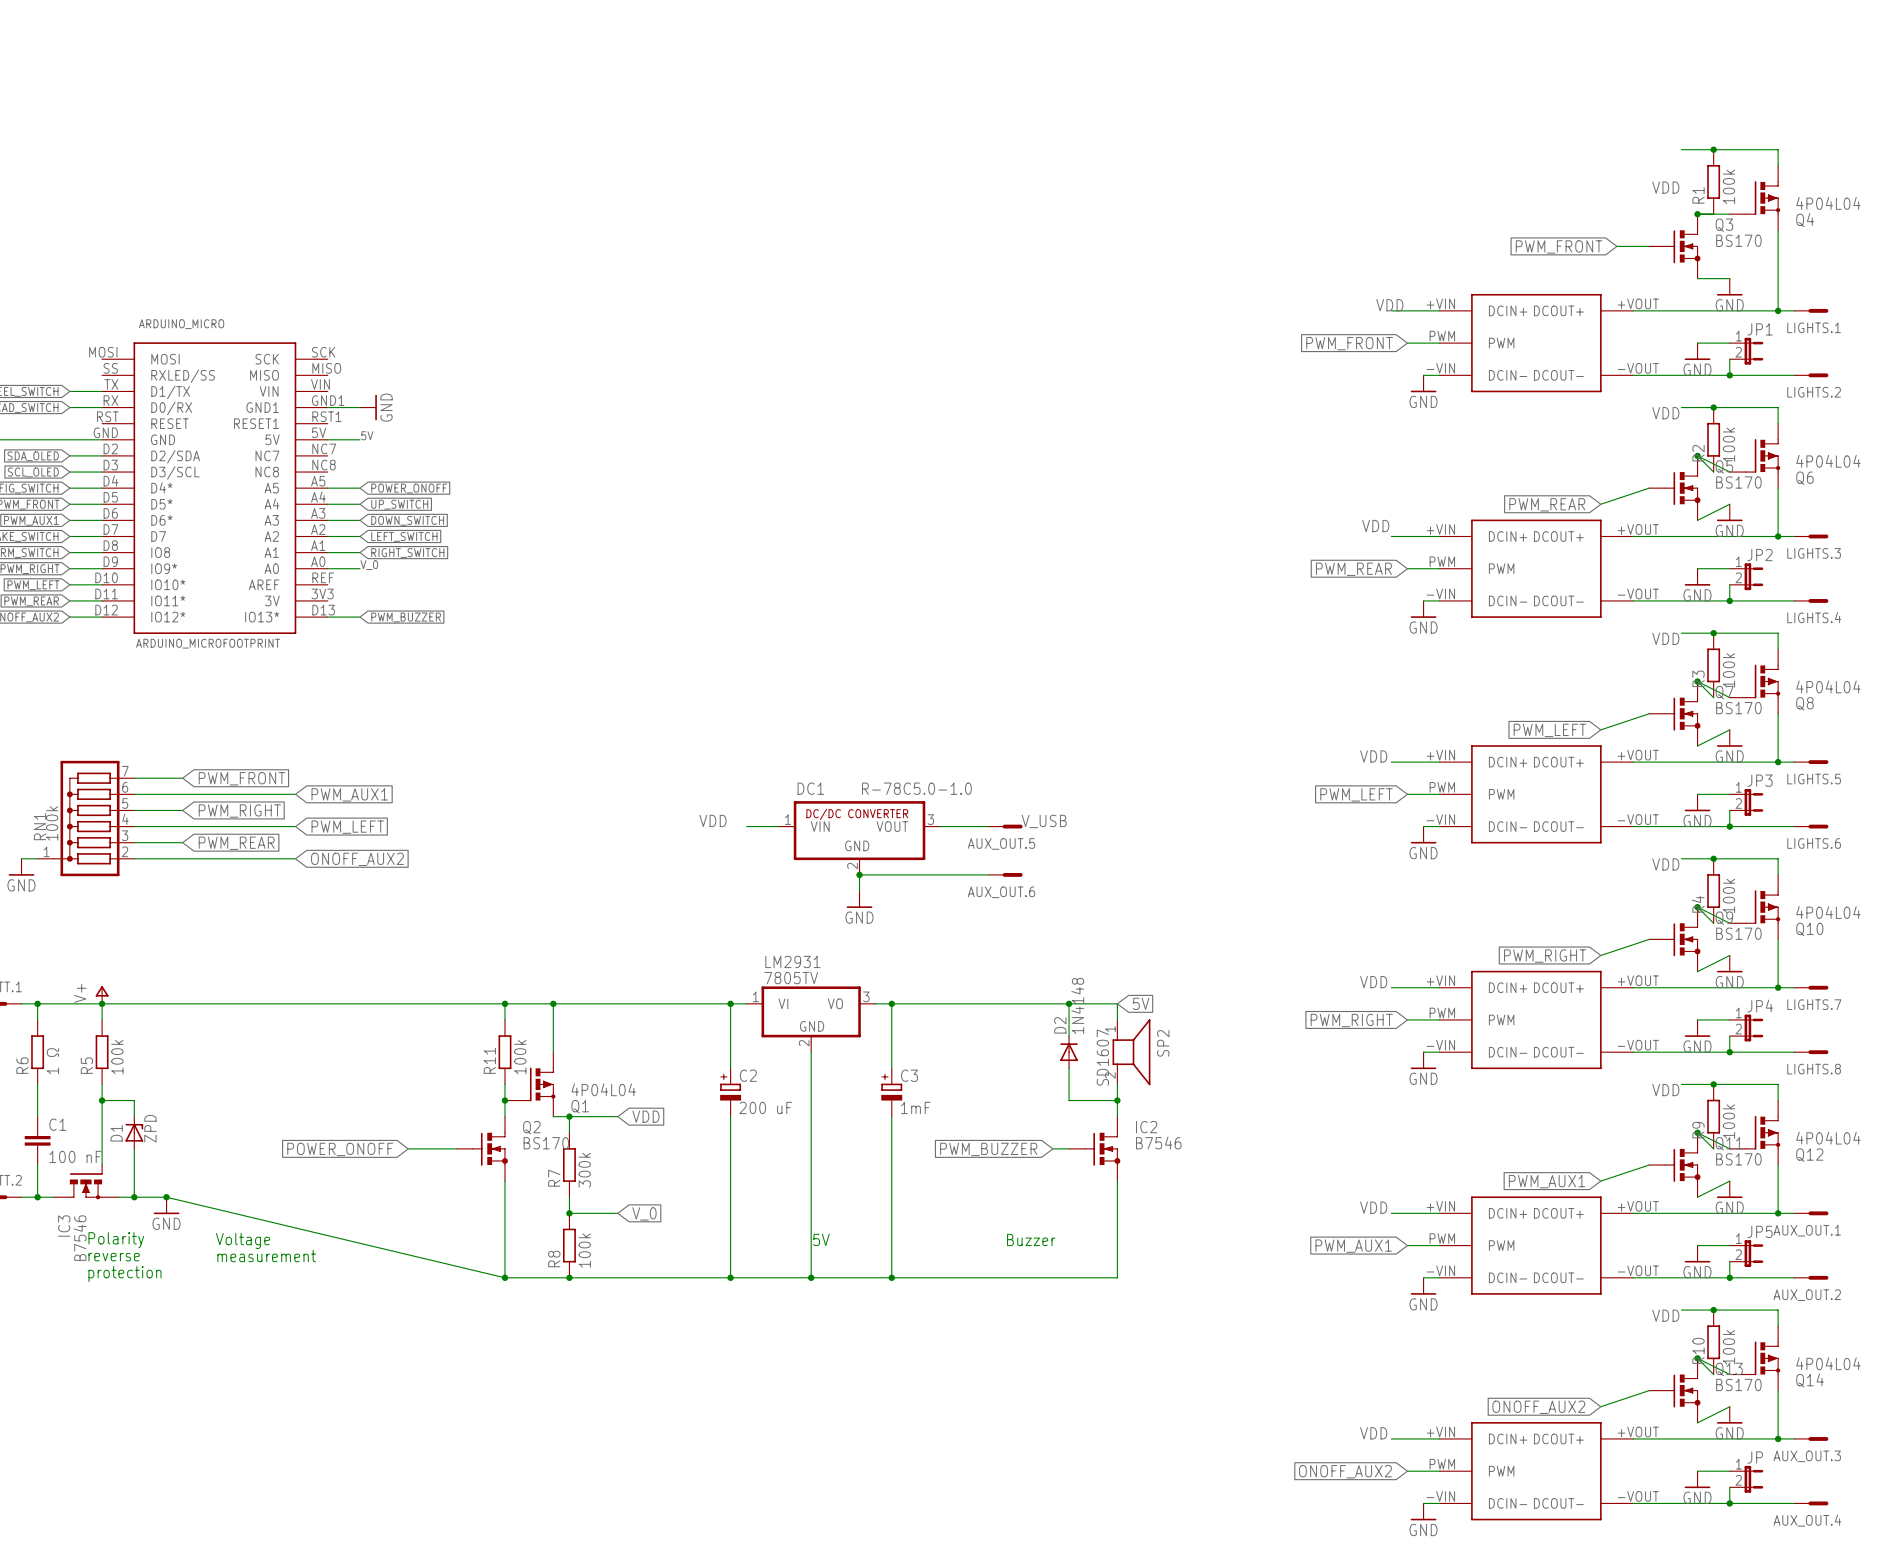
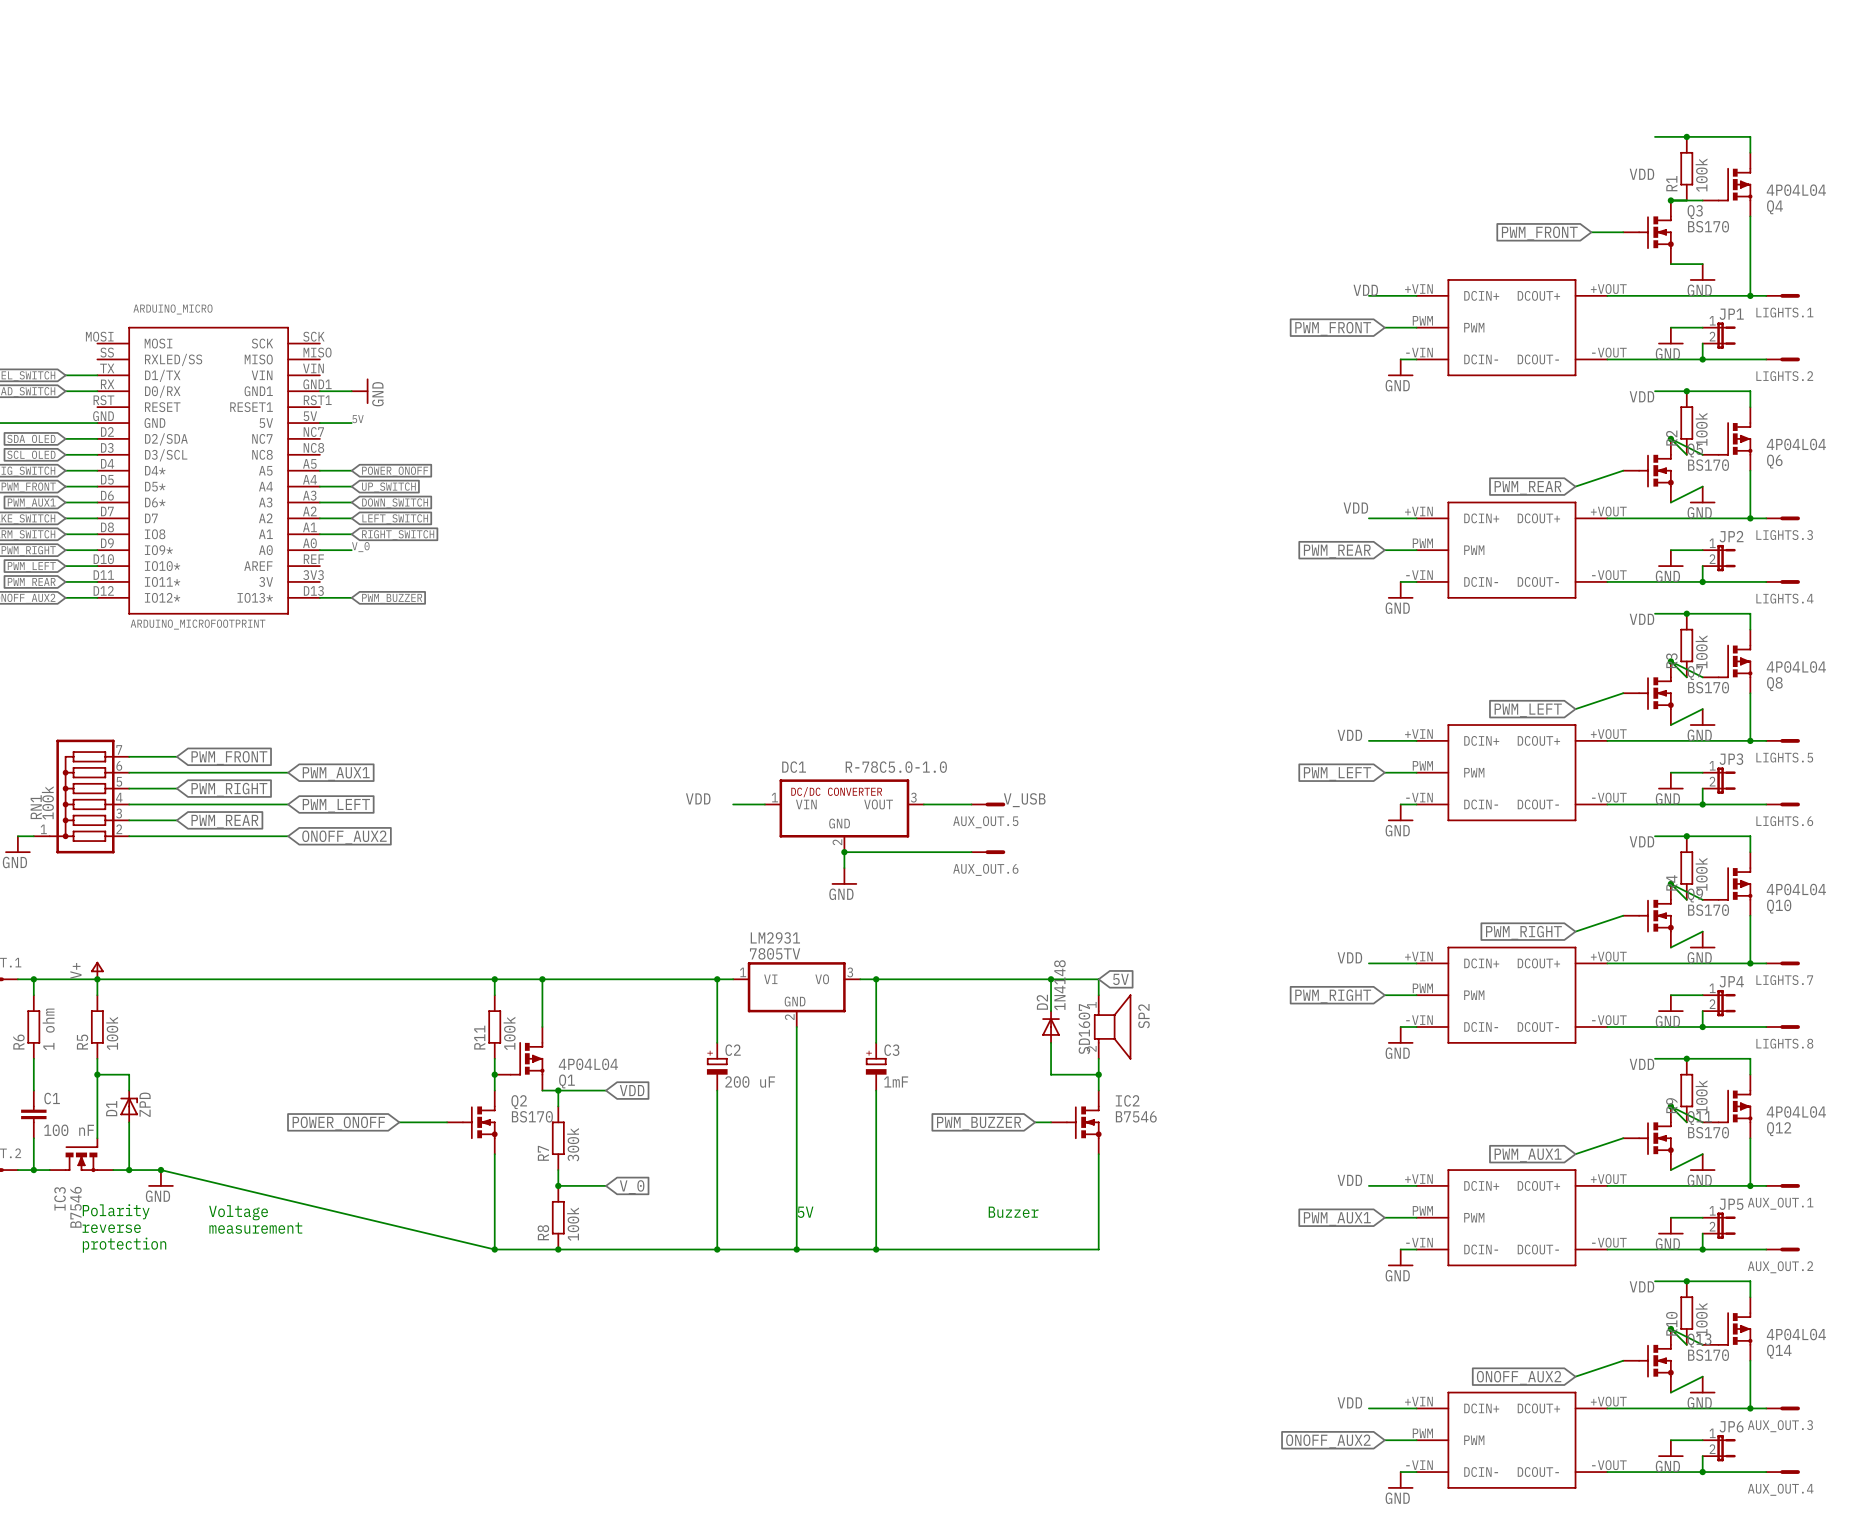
R6 value: 1 Ω (52, 1061) -> 1 ohm (48, 1029)
JP name: JP (1755, 1457) -> JP6 (1731, 1426)

